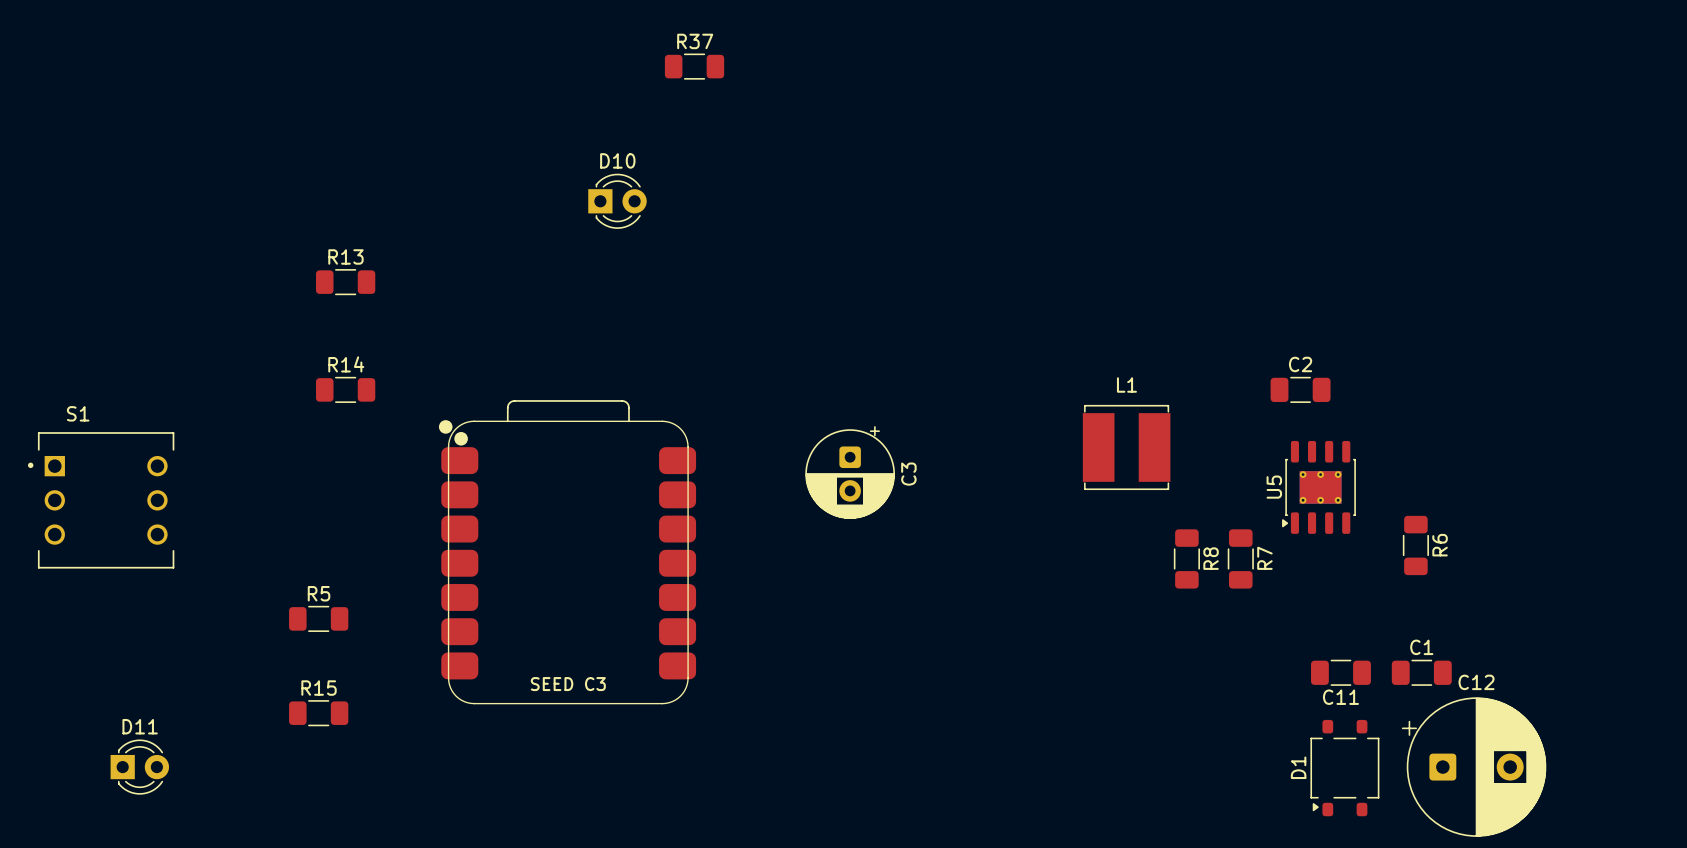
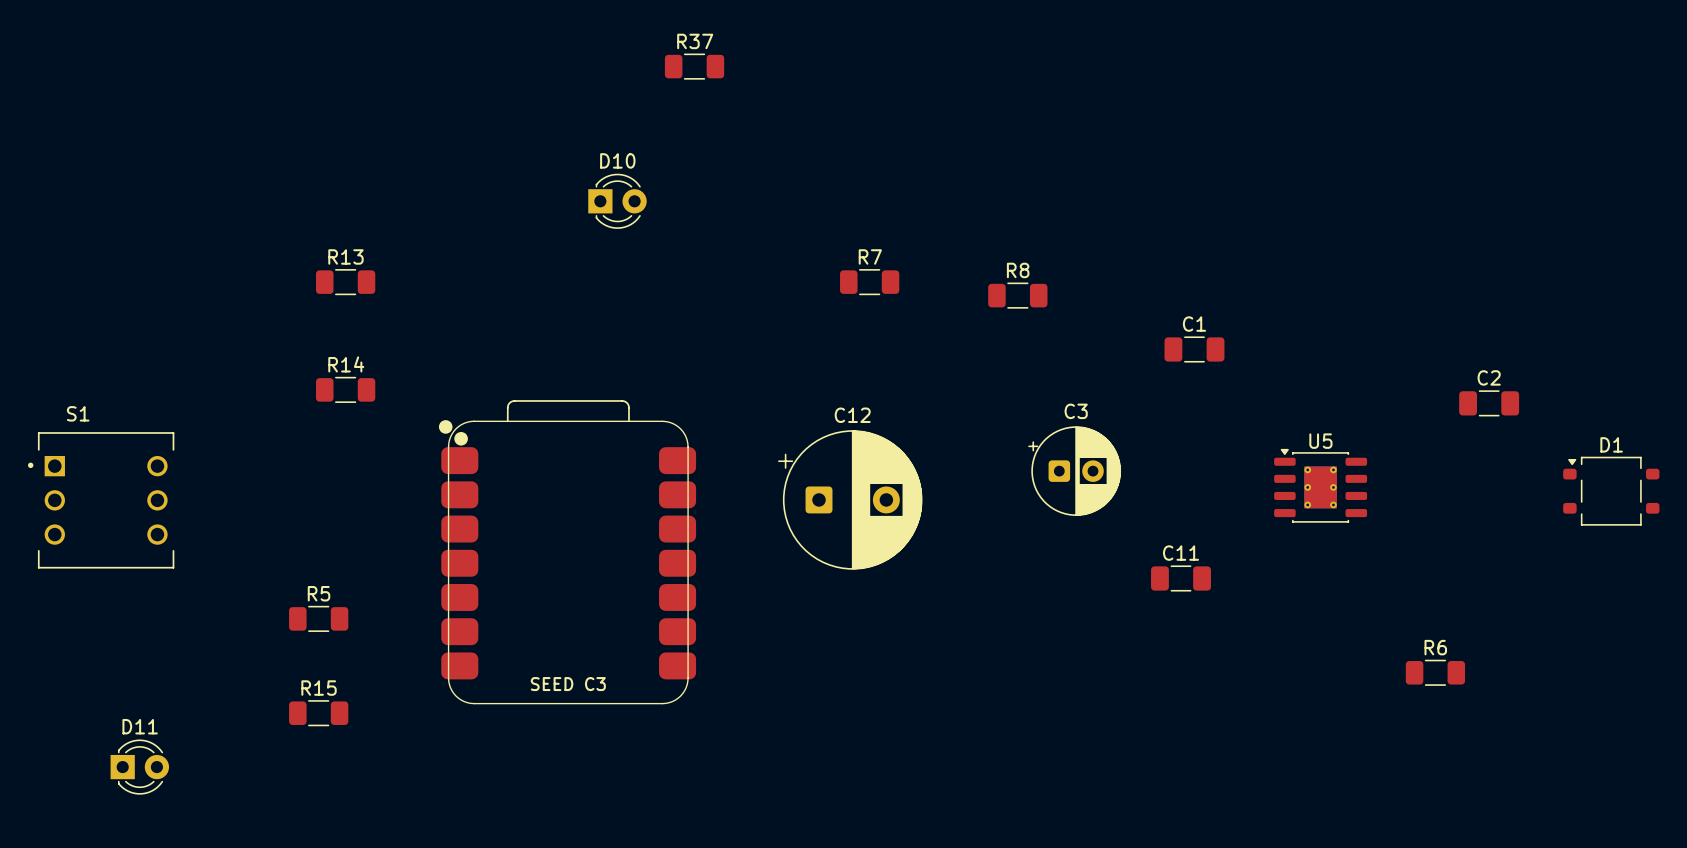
C2 position: (1300, 389) -> (1489, 403)
L1: (1126, 447) -> none
C3 rotation: 0° (850, 472) -> 90° counterclockwise (1074, 471)
C3 position: (850, 472) -> (1074, 471)
U5 rotation: 0° (1318, 487) -> 90° clockwise (1320, 485)
R6 rotation: 0° (1415, 545) -> 90° clockwise (1435, 672)
R6 position: (1415, 545) -> (1435, 672)
R6 name position: R6 (1440, 545) -> R6 (1435, 647)
R8 rotation: 0° (1186, 558) -> 90° clockwise (1017, 295)
R8 position: (1186, 558) -> (1017, 295)
R8 name position: R8 (1211, 558) -> R8 (1018, 270)
R7 rotation: 0° (1240, 558) -> 90° clockwise (869, 282)
R7 position: (1240, 558) -> (869, 282)
R7 name position: R7 (1264, 558) -> R7 (870, 256)
C11 position: (1340, 672) -> (1181, 578)
C1 position: (1421, 672) -> (1194, 349)
C11 name position: C11 (1340, 697) -> C11 (1181, 553)
C12 position: (1474, 767) -> (850, 499)
D1 rotation: 0° (1344, 768) -> 90° clockwise (1611, 491)
D1 position: (1344, 768) -> (1611, 491)

